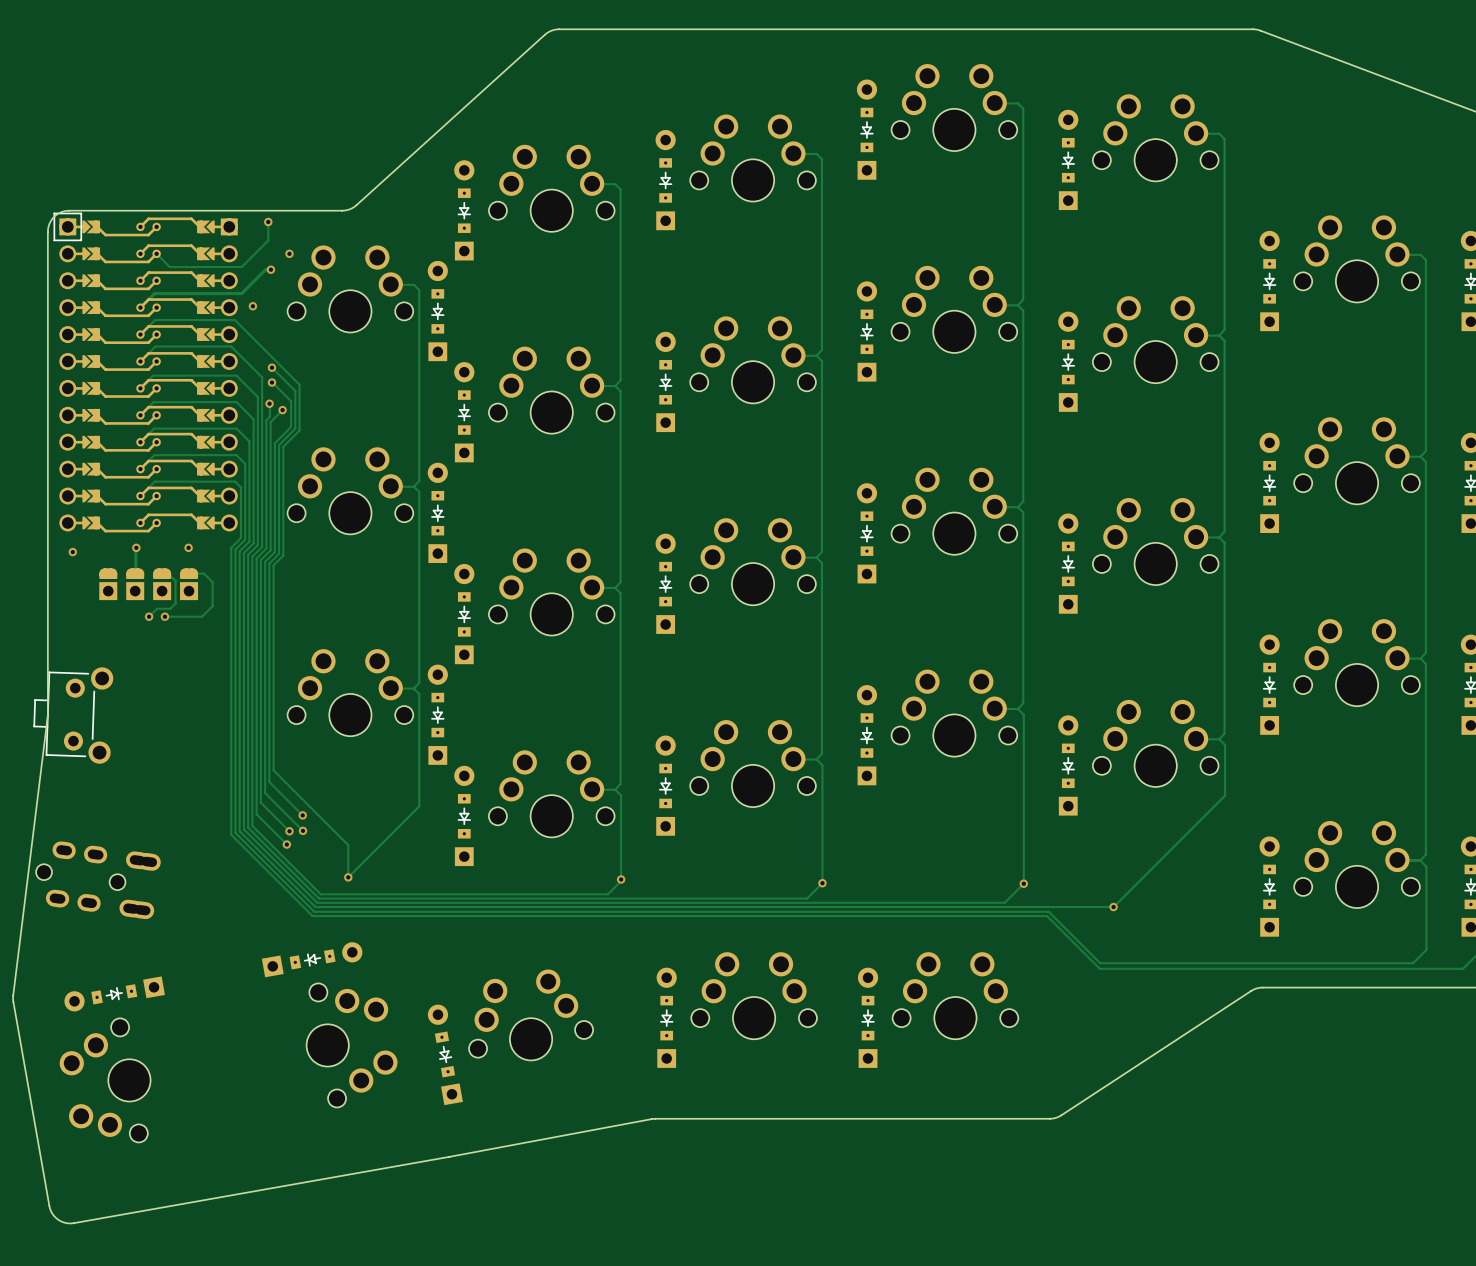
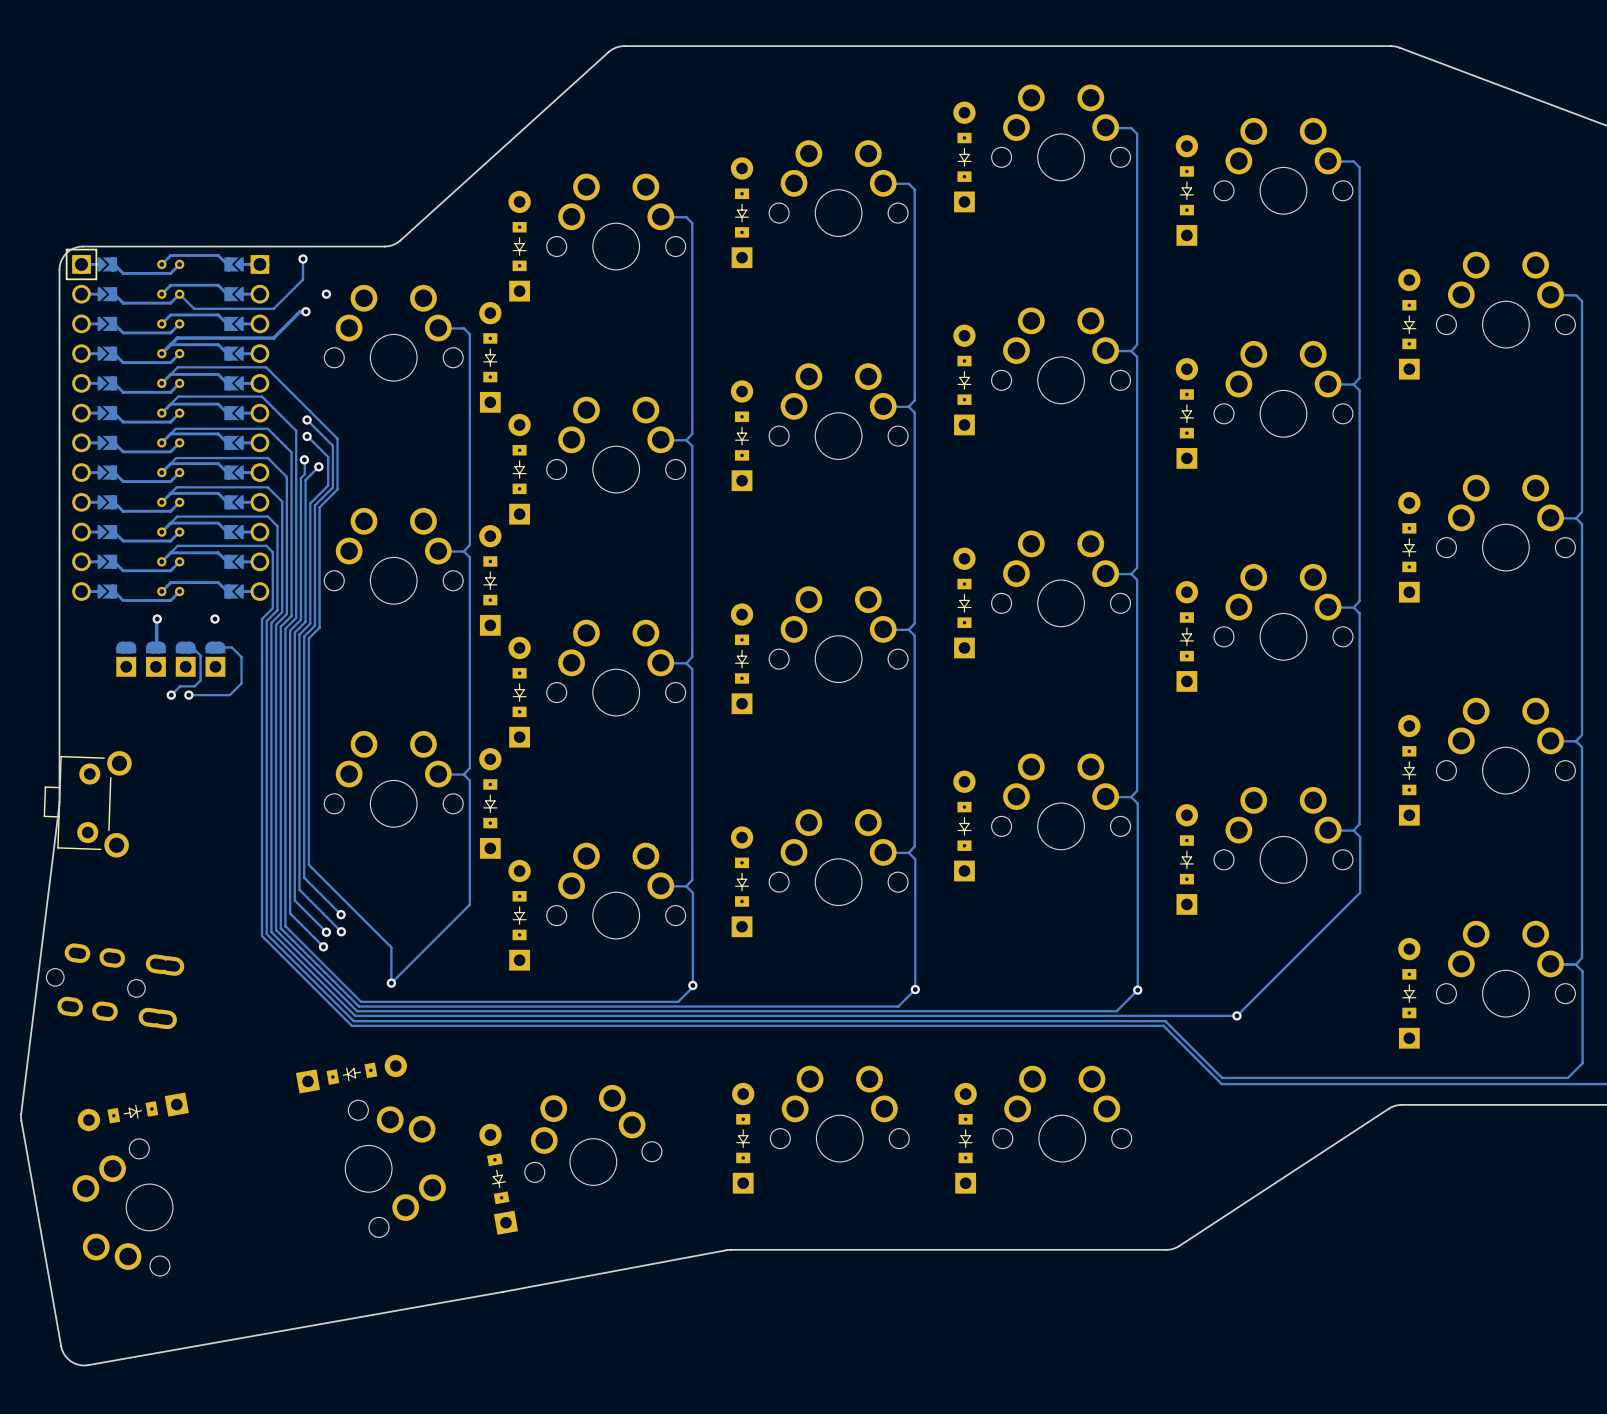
via: (252, 306) -> none
via: (72, 552) -> none

